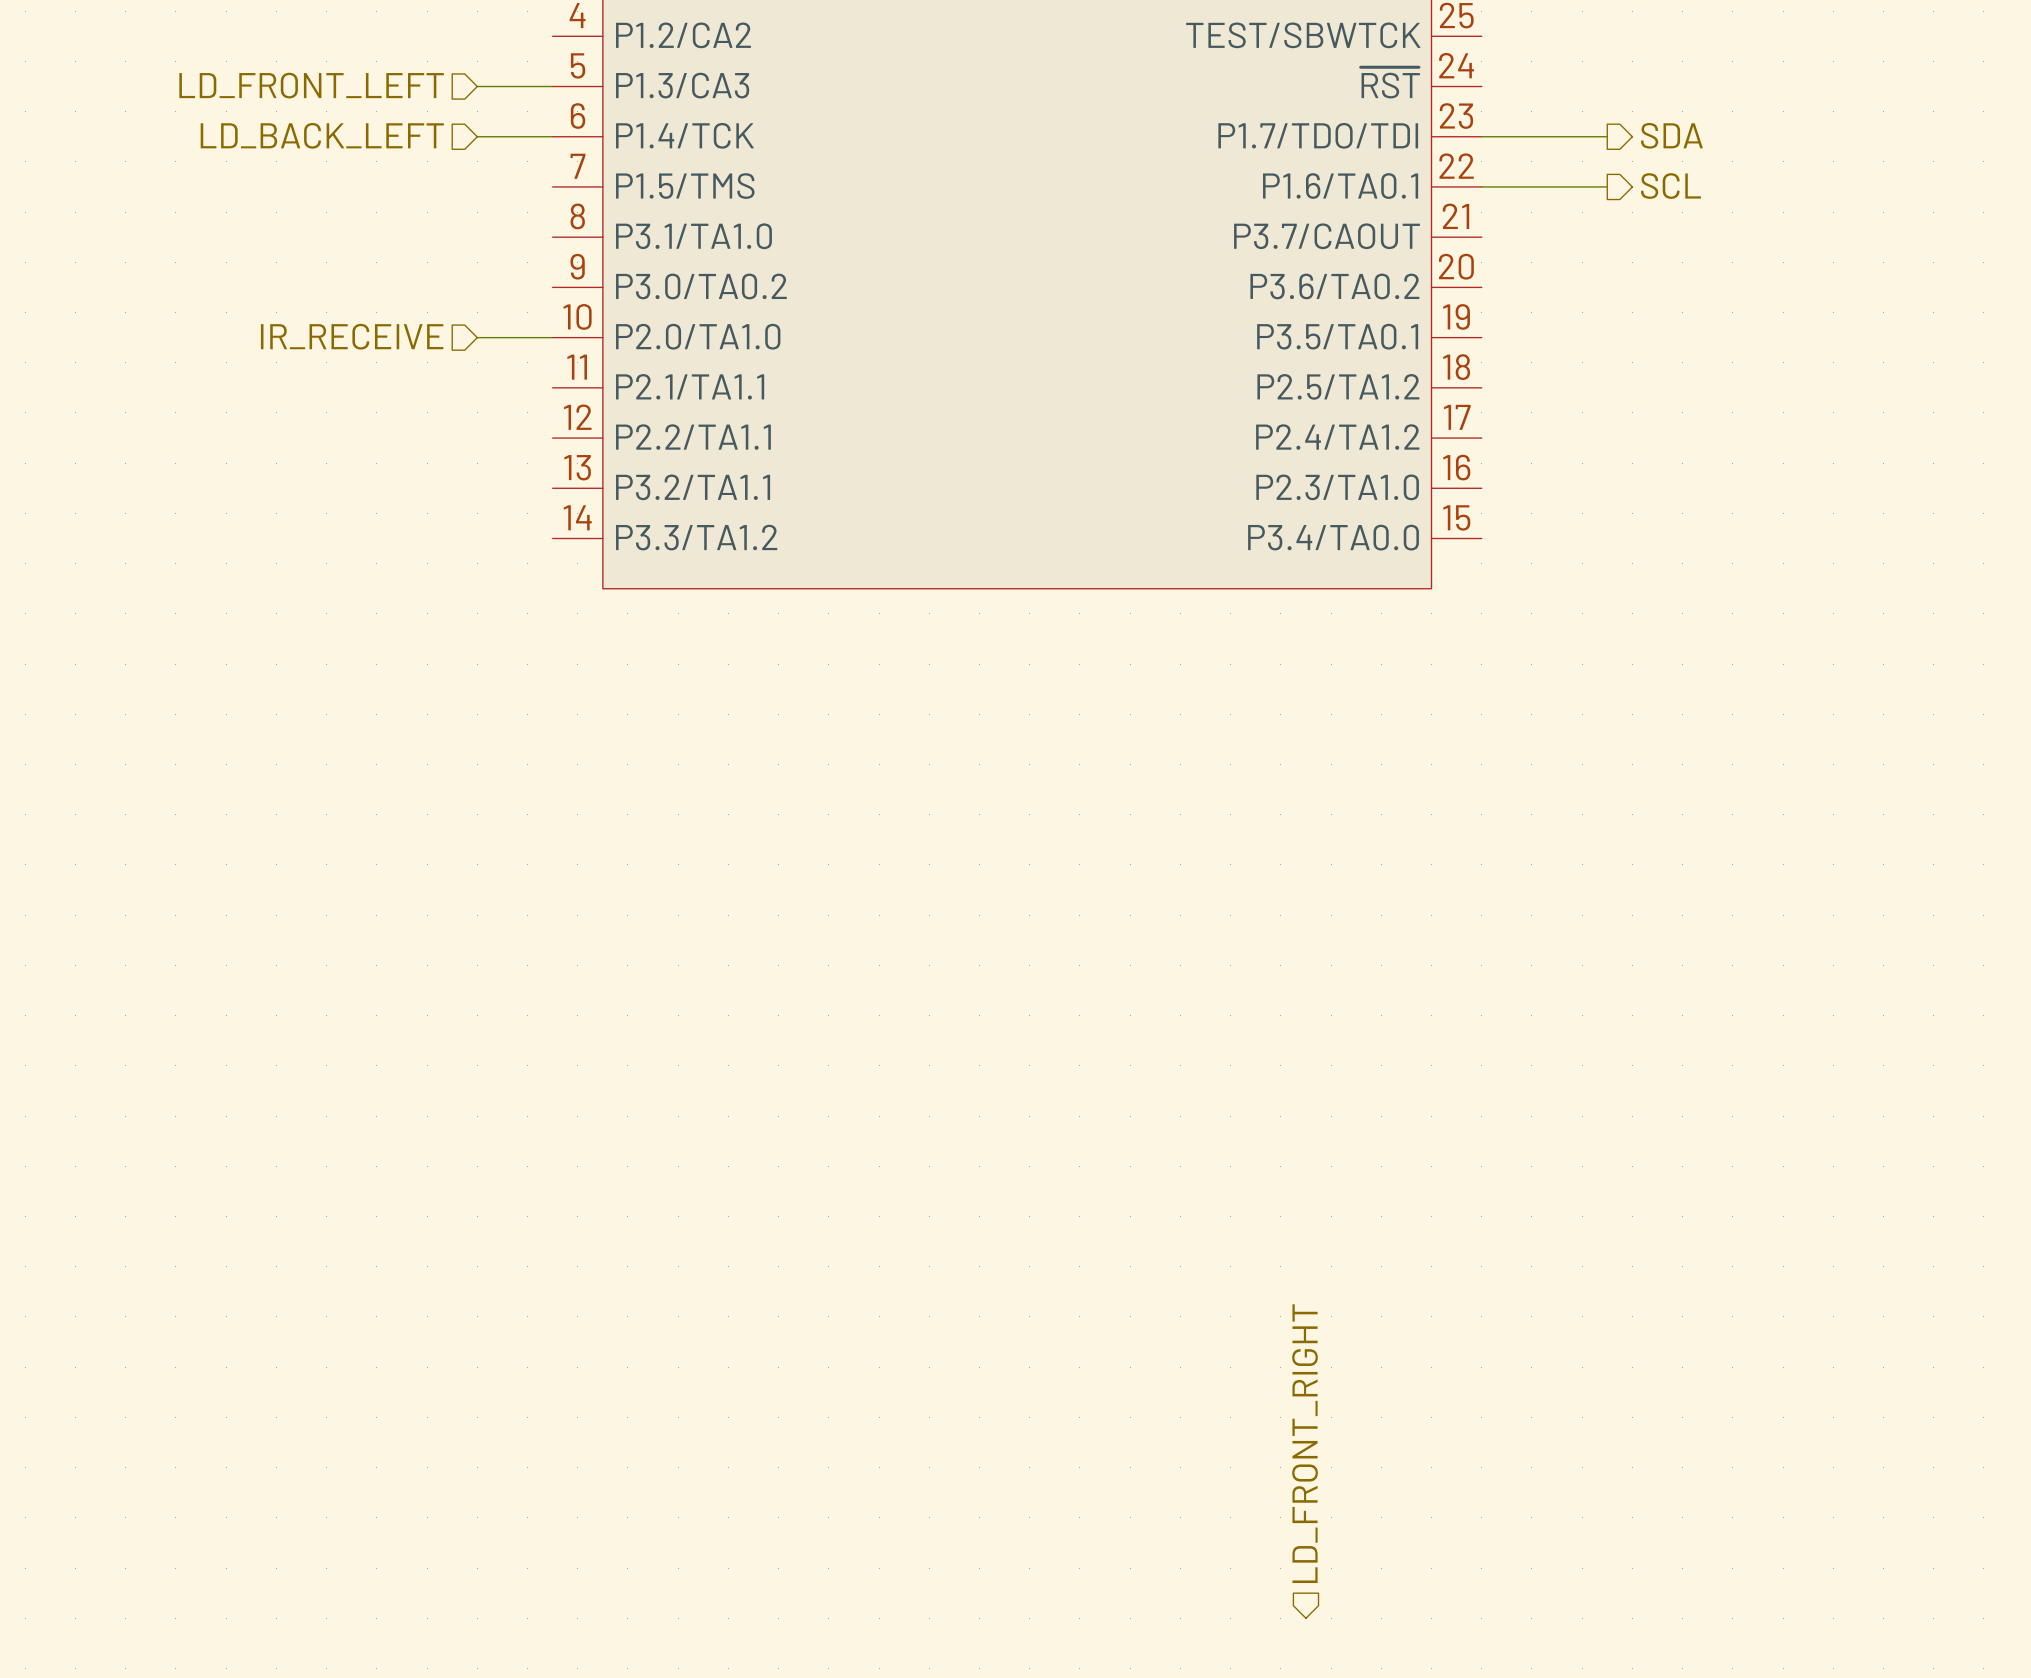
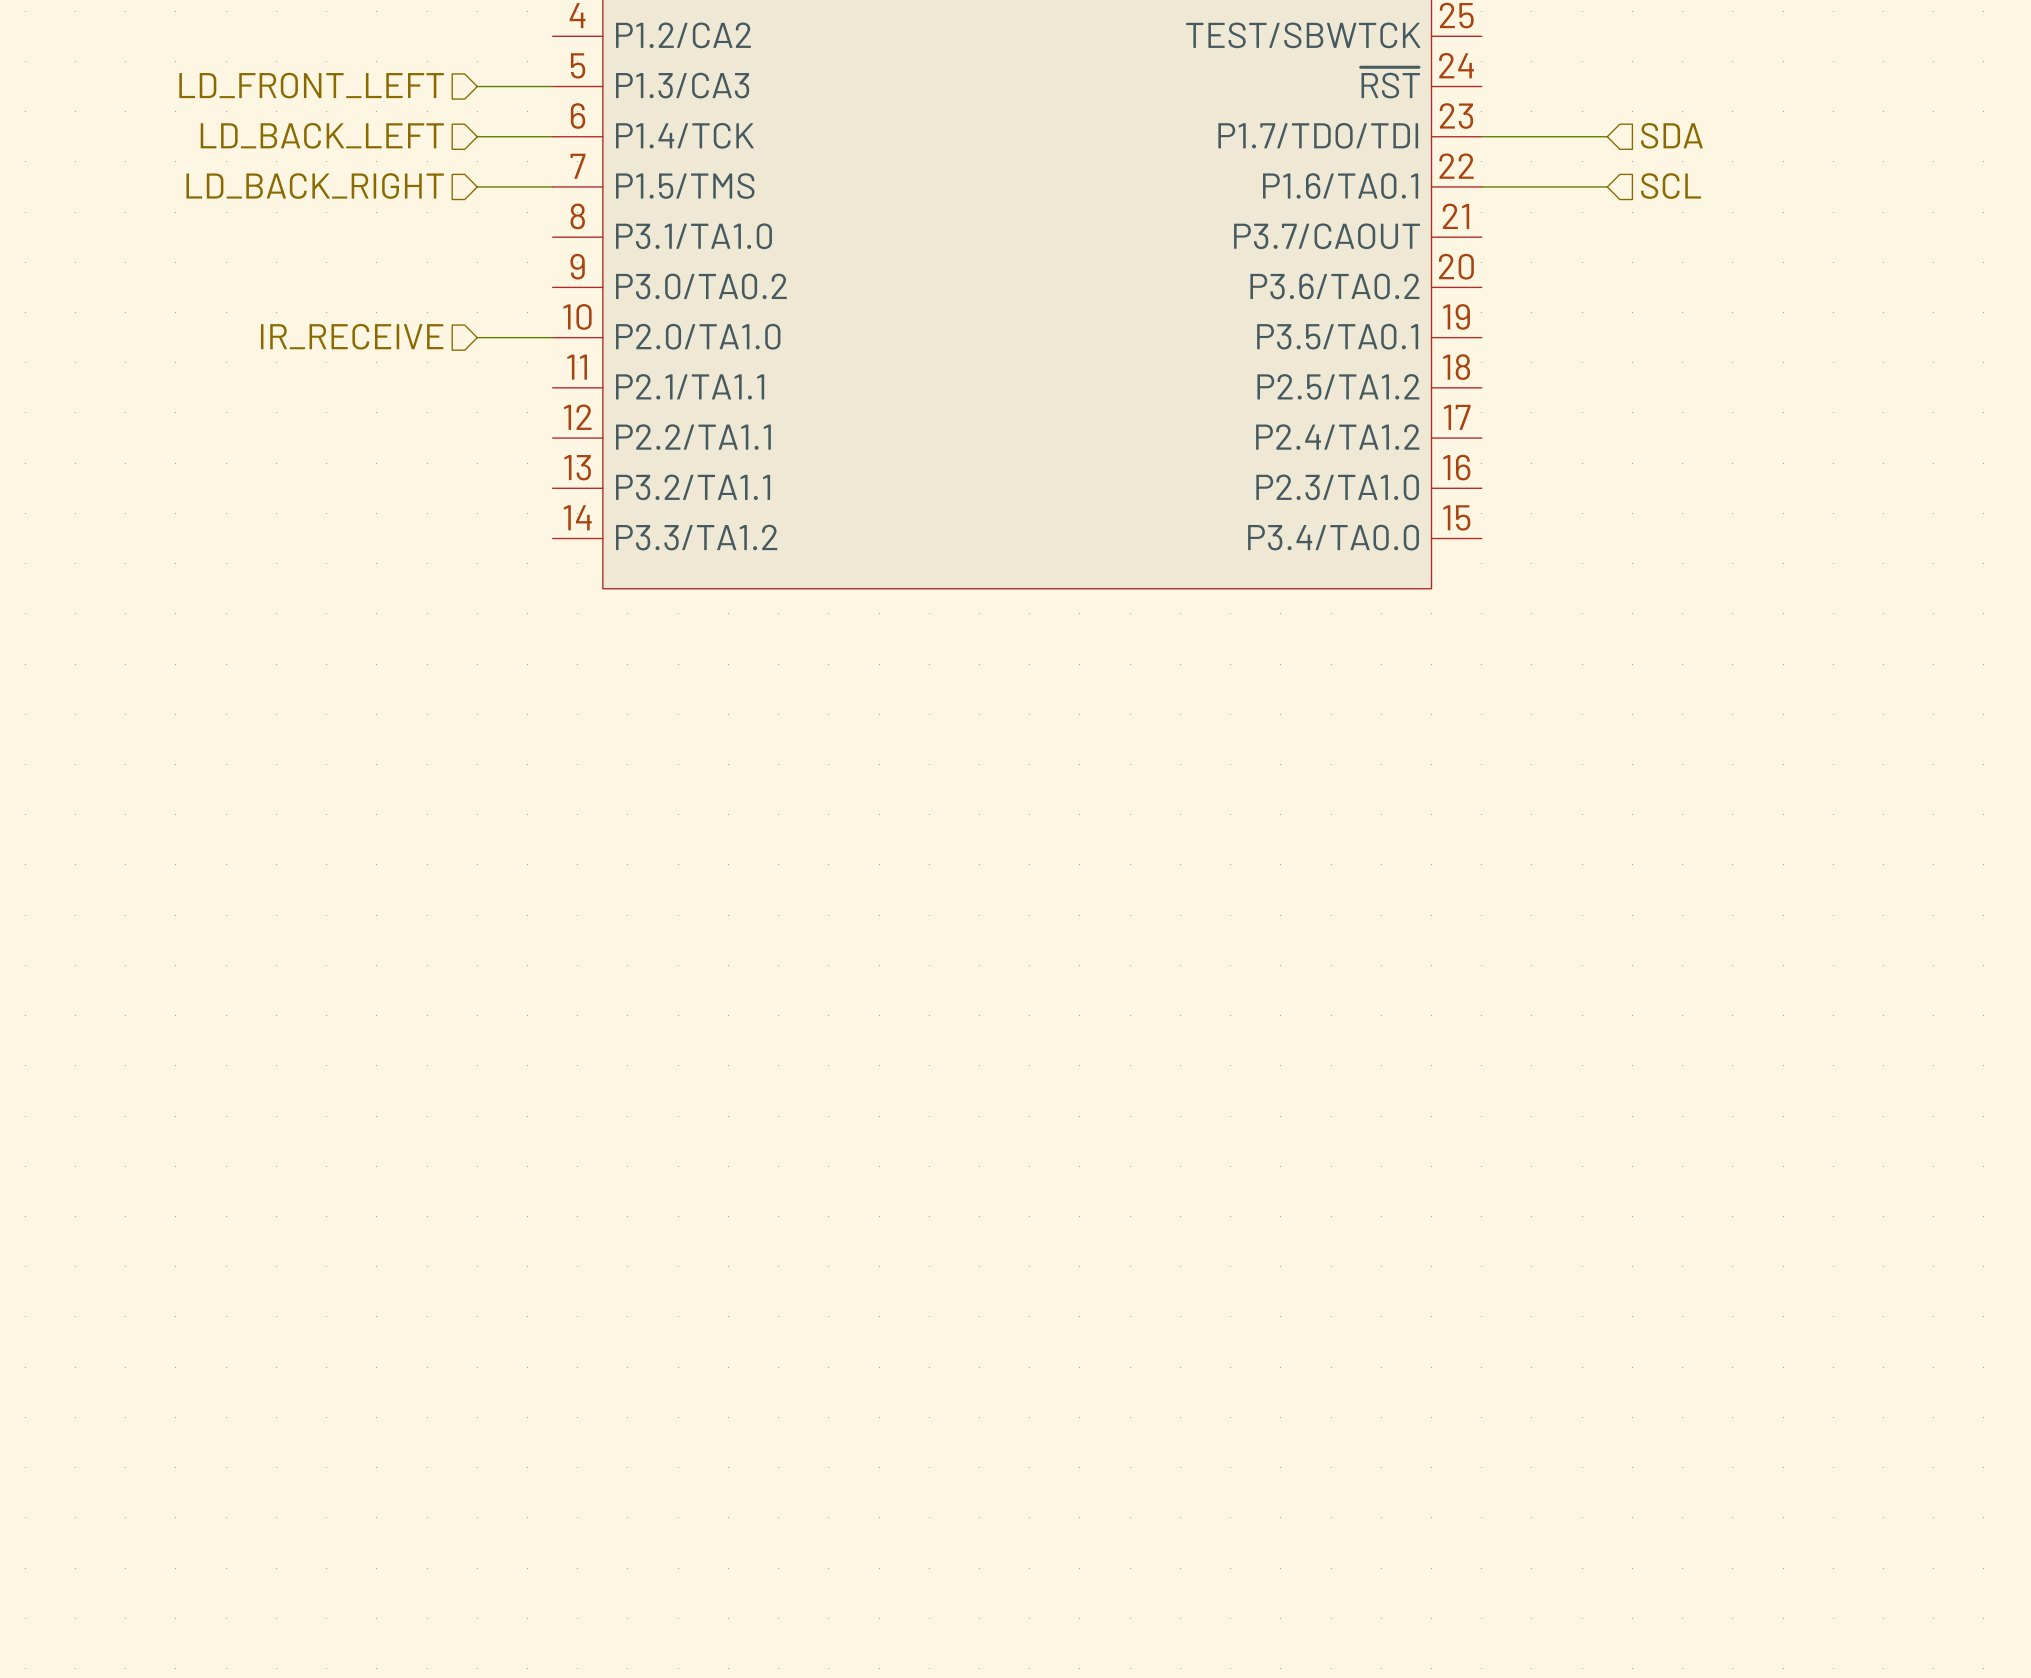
hierarchical label shape: output (1671, 135) -> input (1671, 135)
hierarchical label: none -> LD_BACK_RIGHT (315, 186)
wire: none -> (477, 186) (552, 186)
hierarchical label shape: output (1671, 186) -> input (1671, 186)
hierarchical label: LD_FRONT_RIGHT (1305, 1443) -> none

